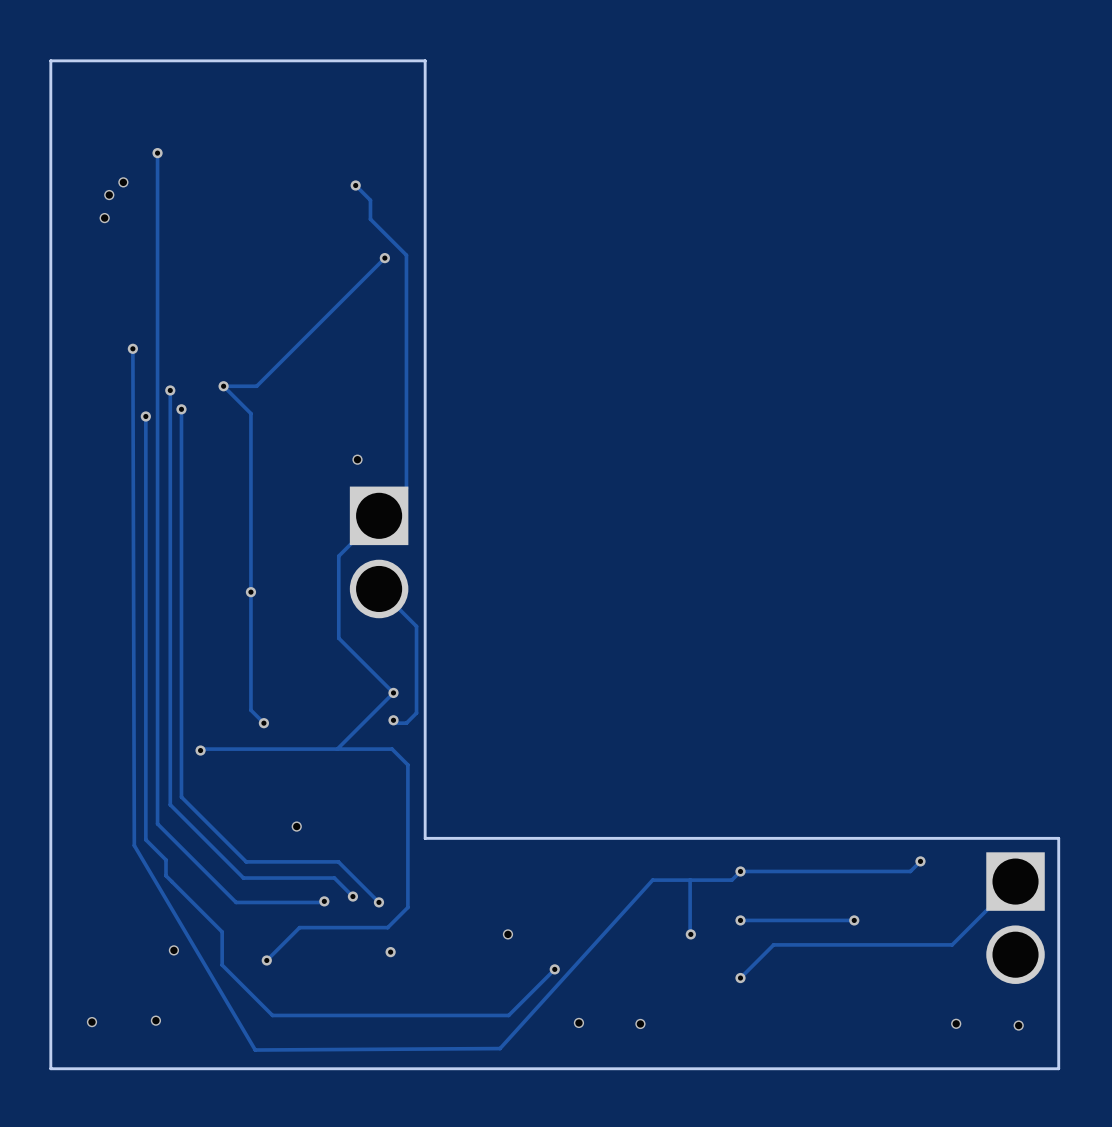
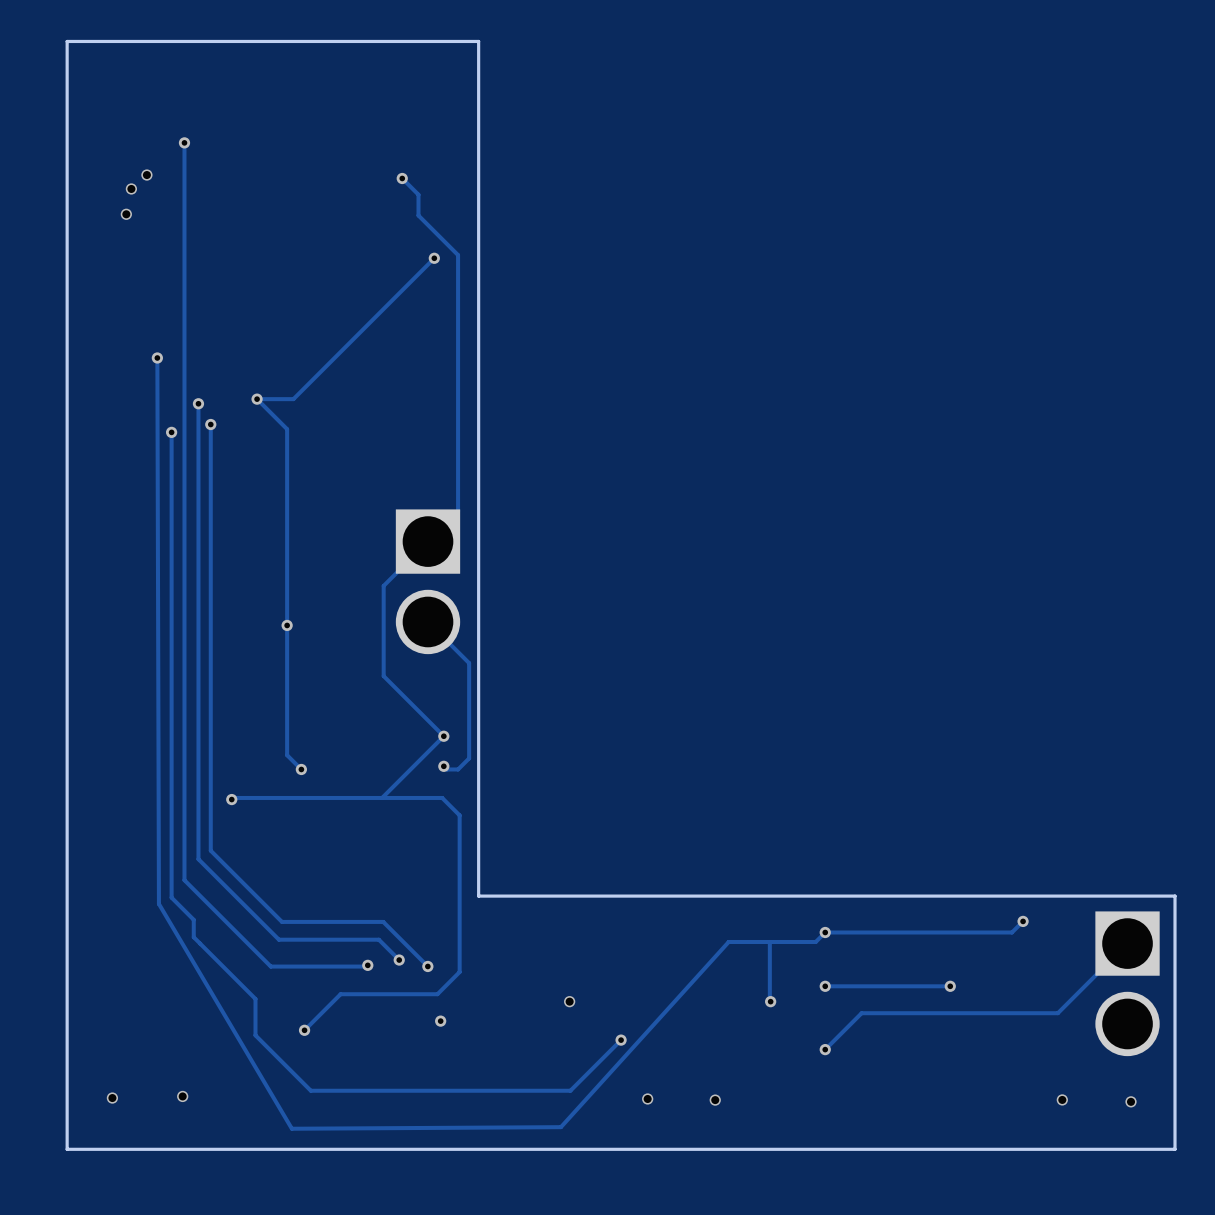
via: (357, 459) -> none
via: (296, 826) -> none
via: (173, 950) -> none

